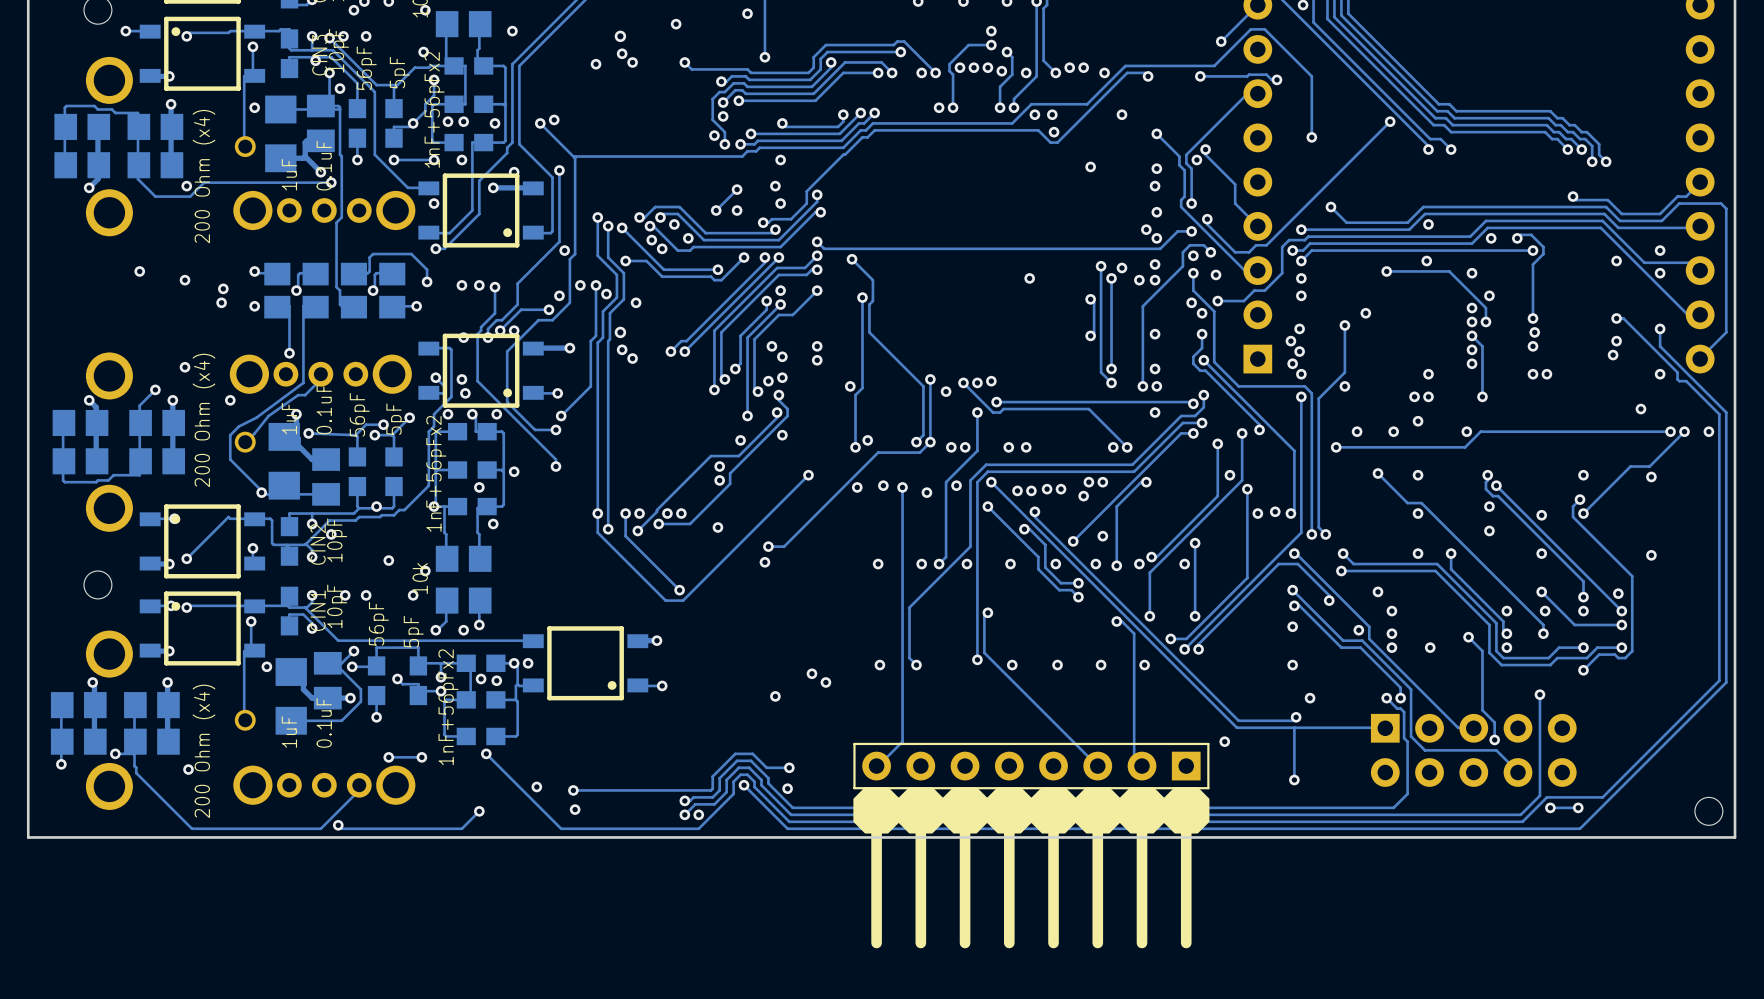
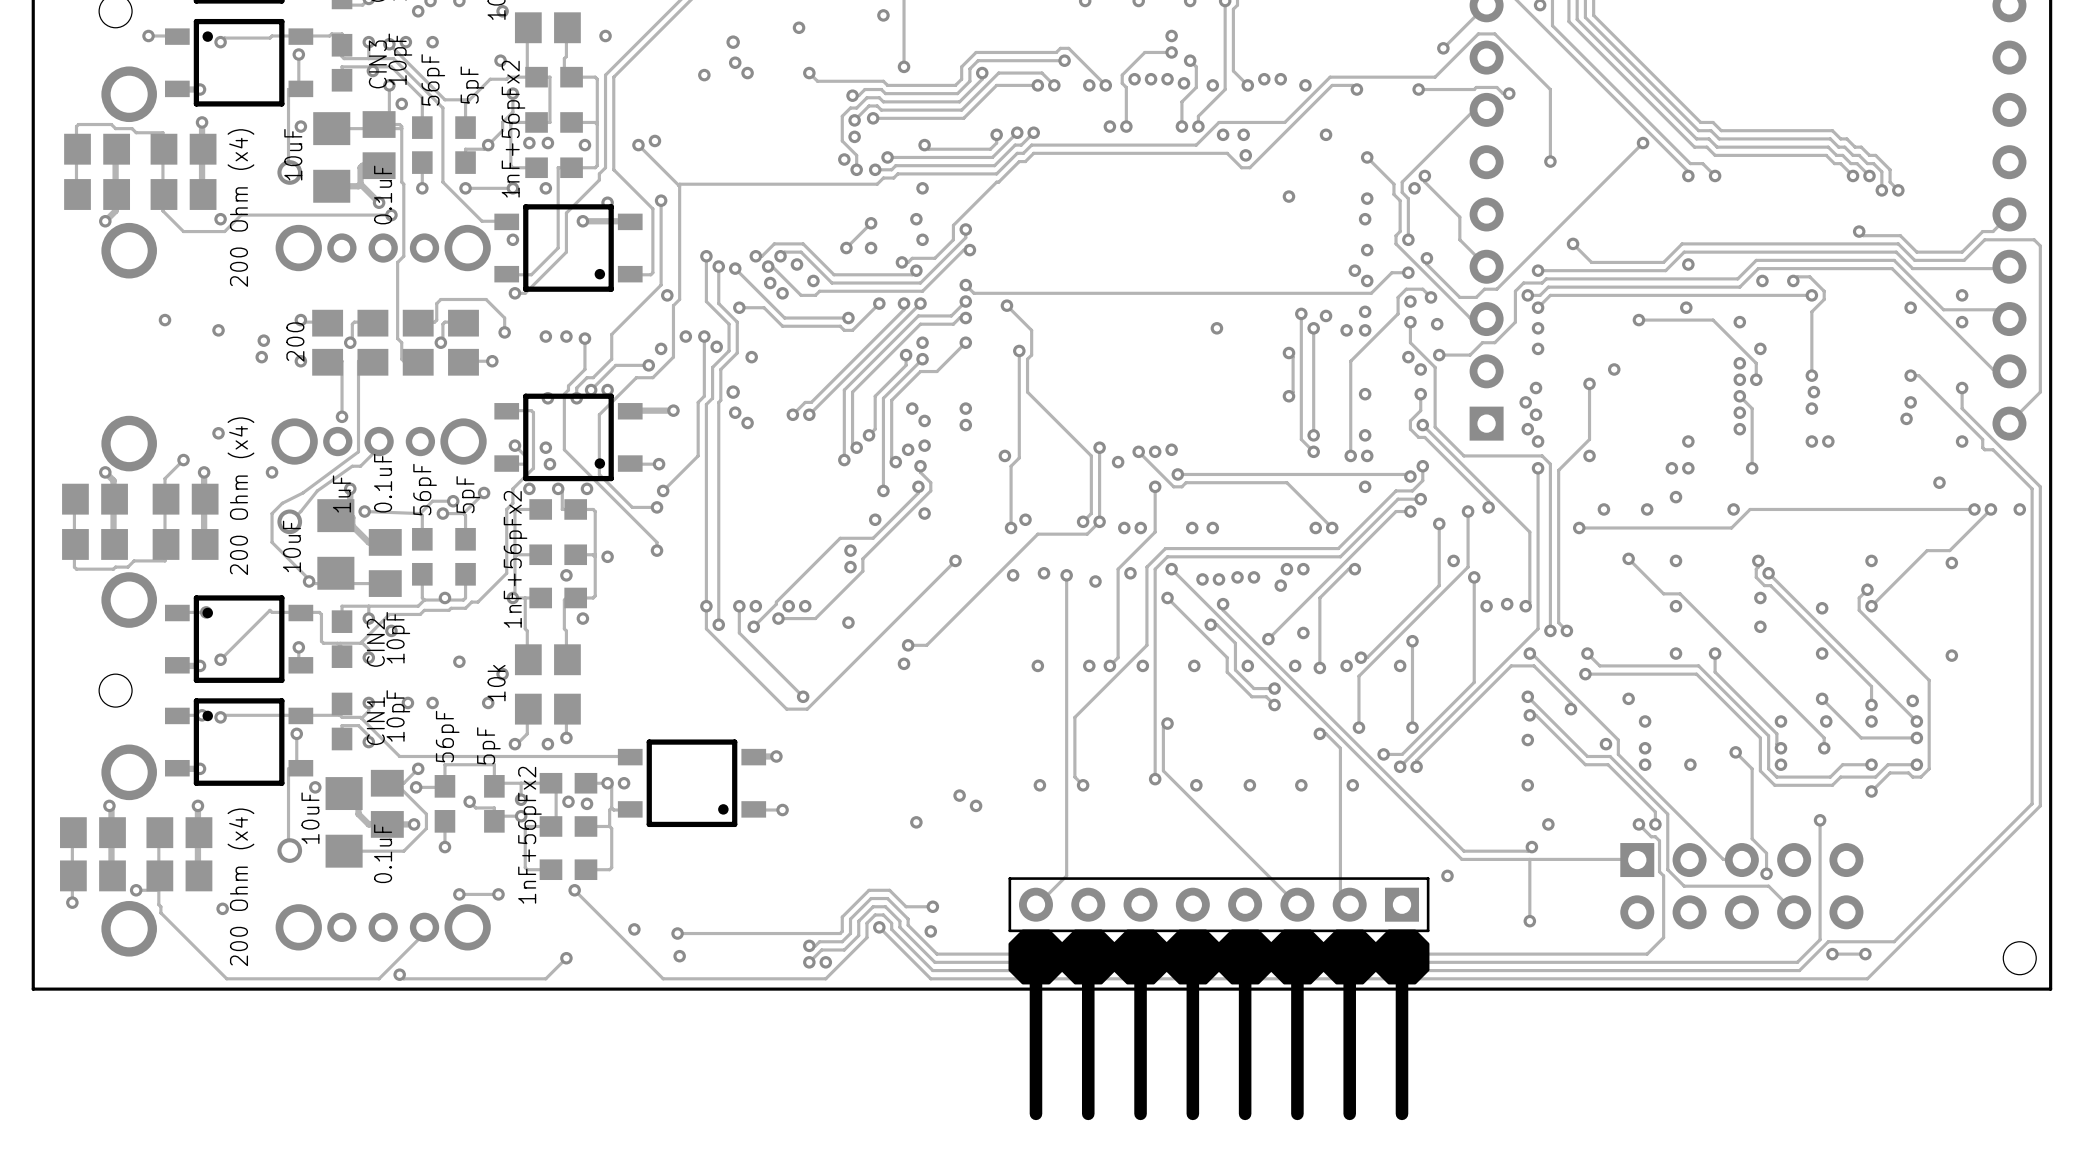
part value: none -> 10uF (293, 154)
text: 1uF (289, 174) -> none
part value: none -> 200 (295, 341)
part value: none -> 10uF (291, 546)
part value: none -> 10uF (310, 818)
text: 1uF (289, 732) -> none

